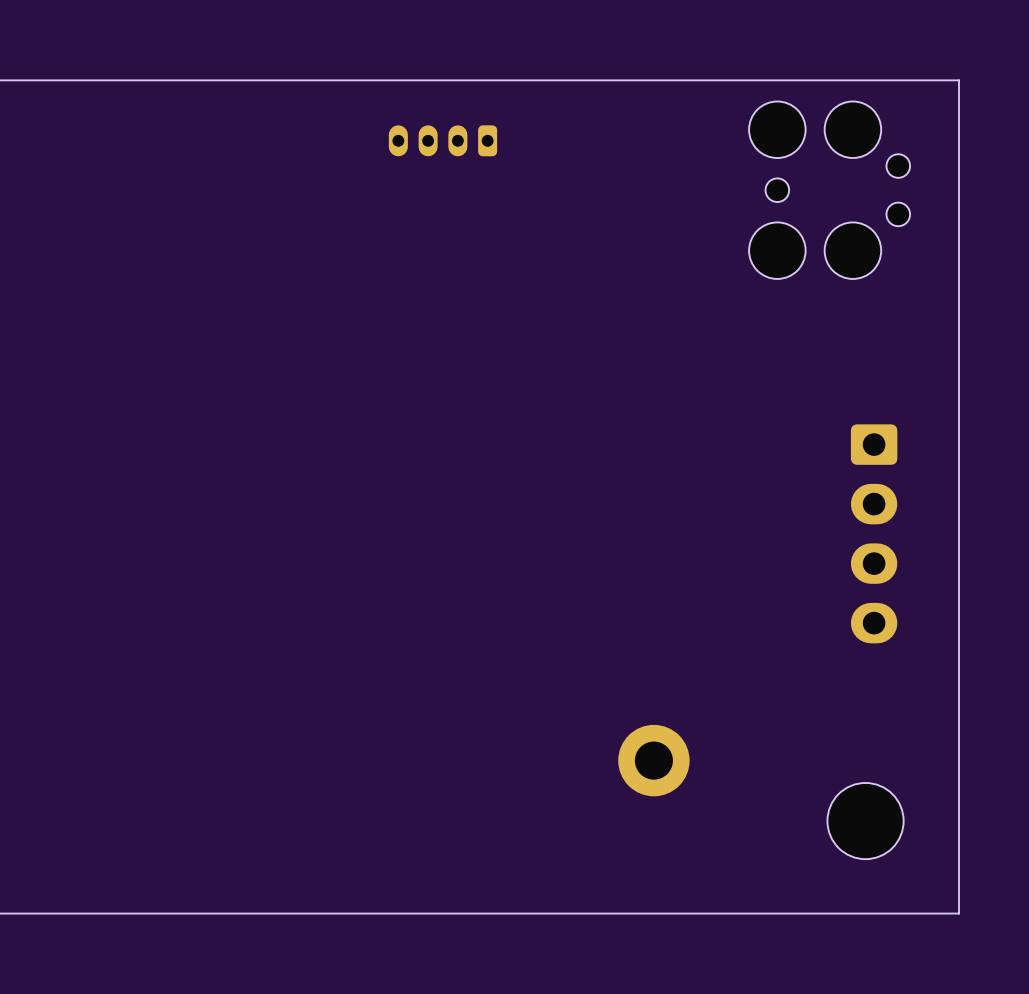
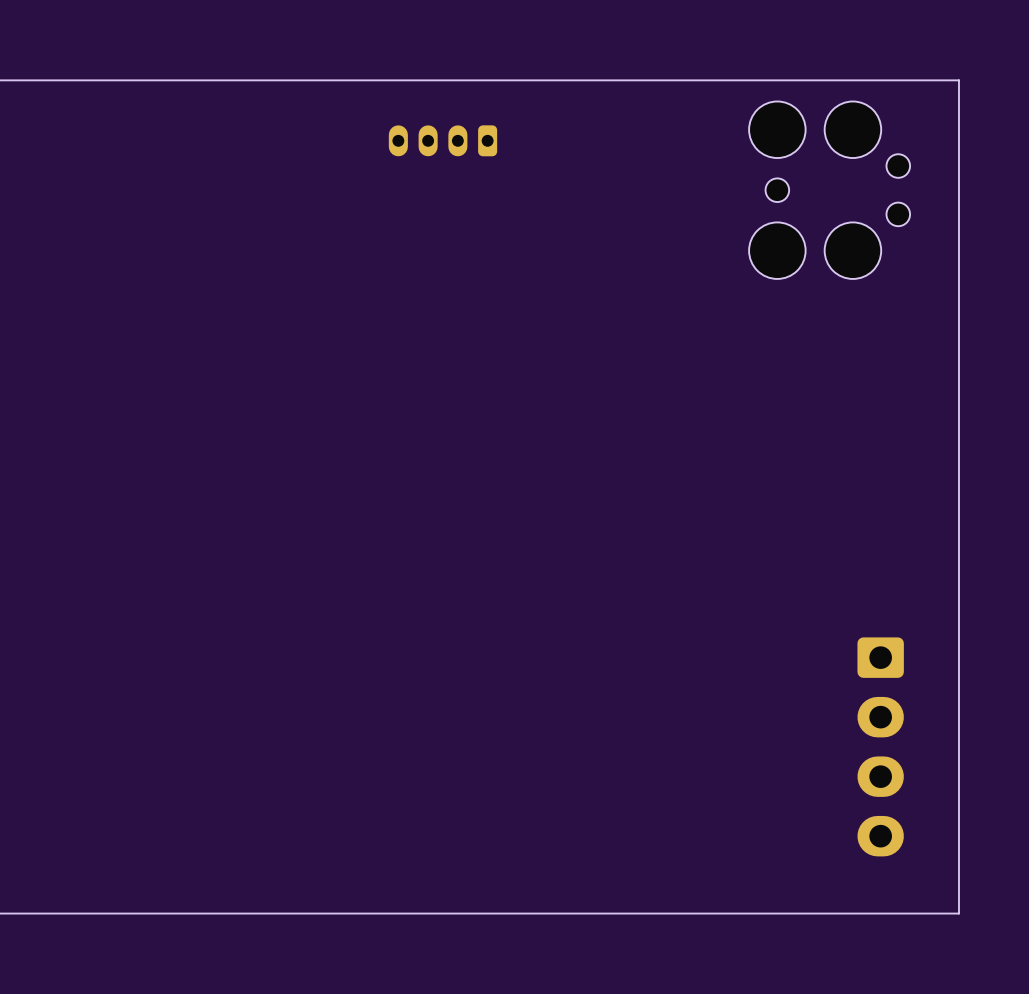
part position: (874, 533) -> (880, 746)
part: (653, 760) -> none
part: (865, 821) -> none

